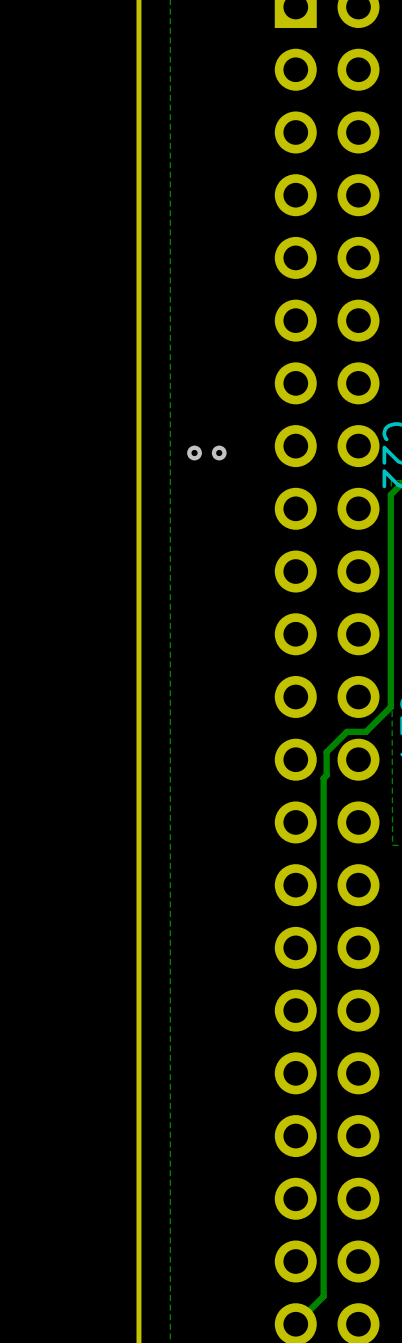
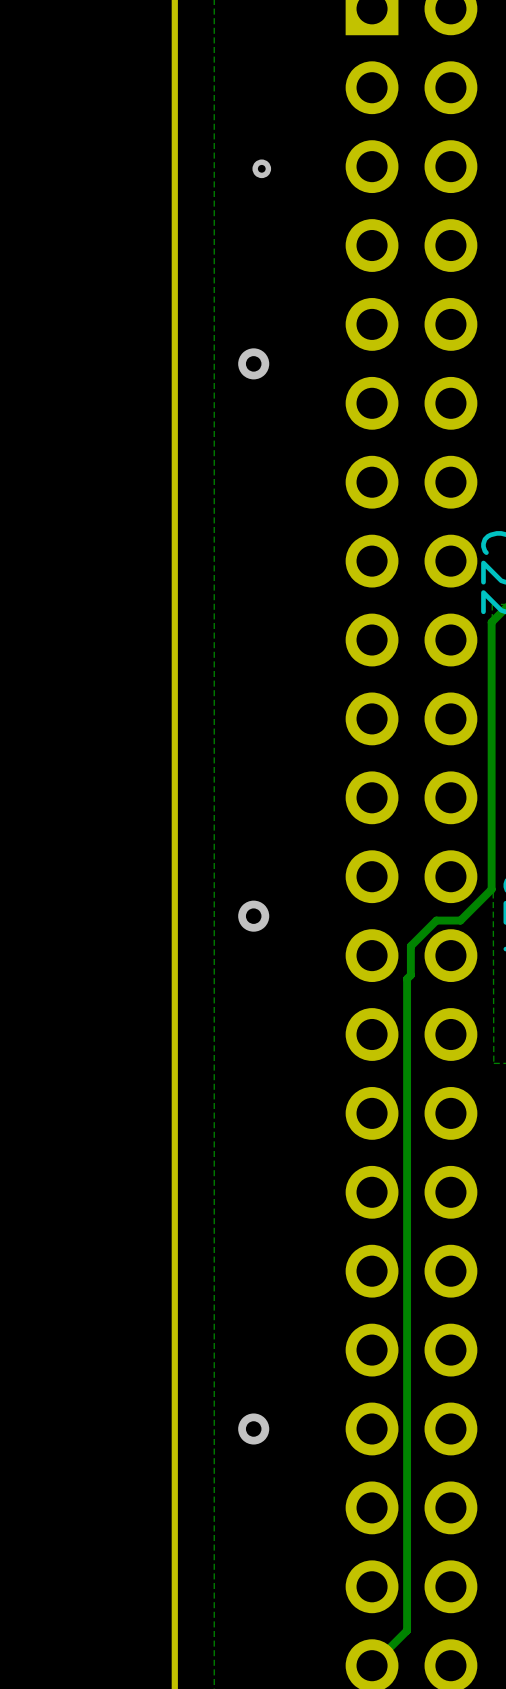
via: none -> (261, 168)
via: none -> (253, 363)
via: (194, 453) -> none
via: (219, 453) -> none
via: none -> (253, 916)
via: none -> (253, 1428)

